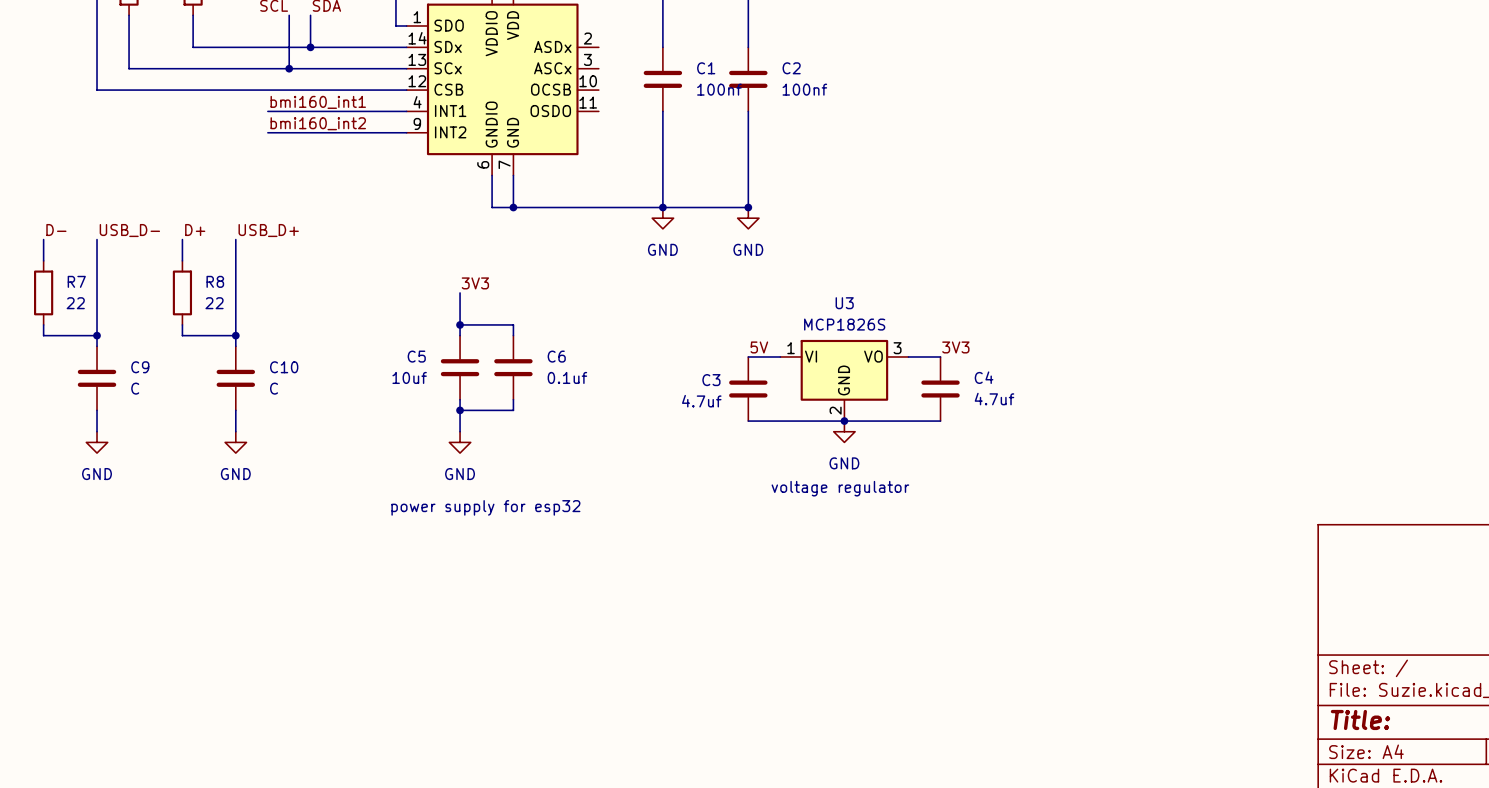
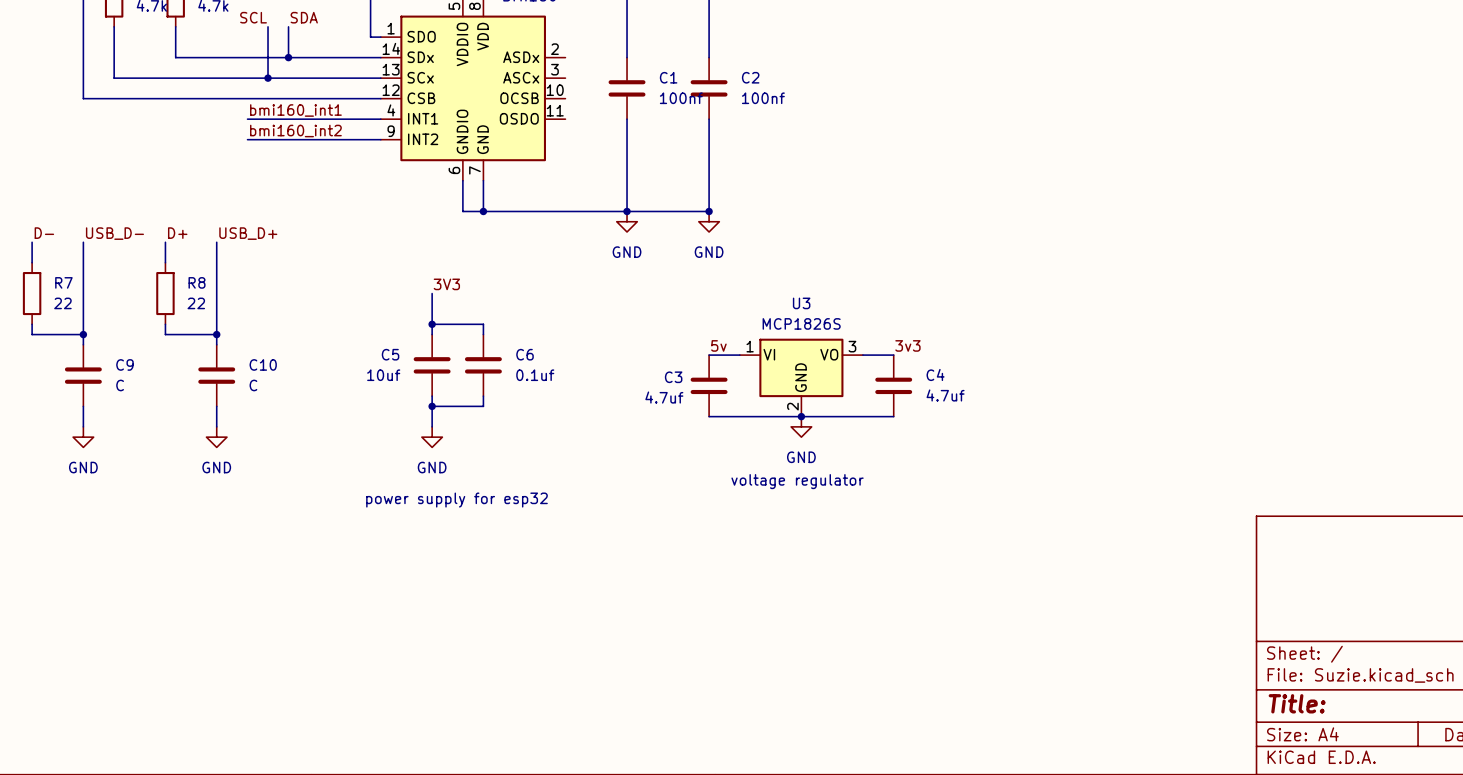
label: 5V (759, 347) -> 5v (718, 345)
label: 3V3 (955, 347) -> 3v3 (907, 345)

